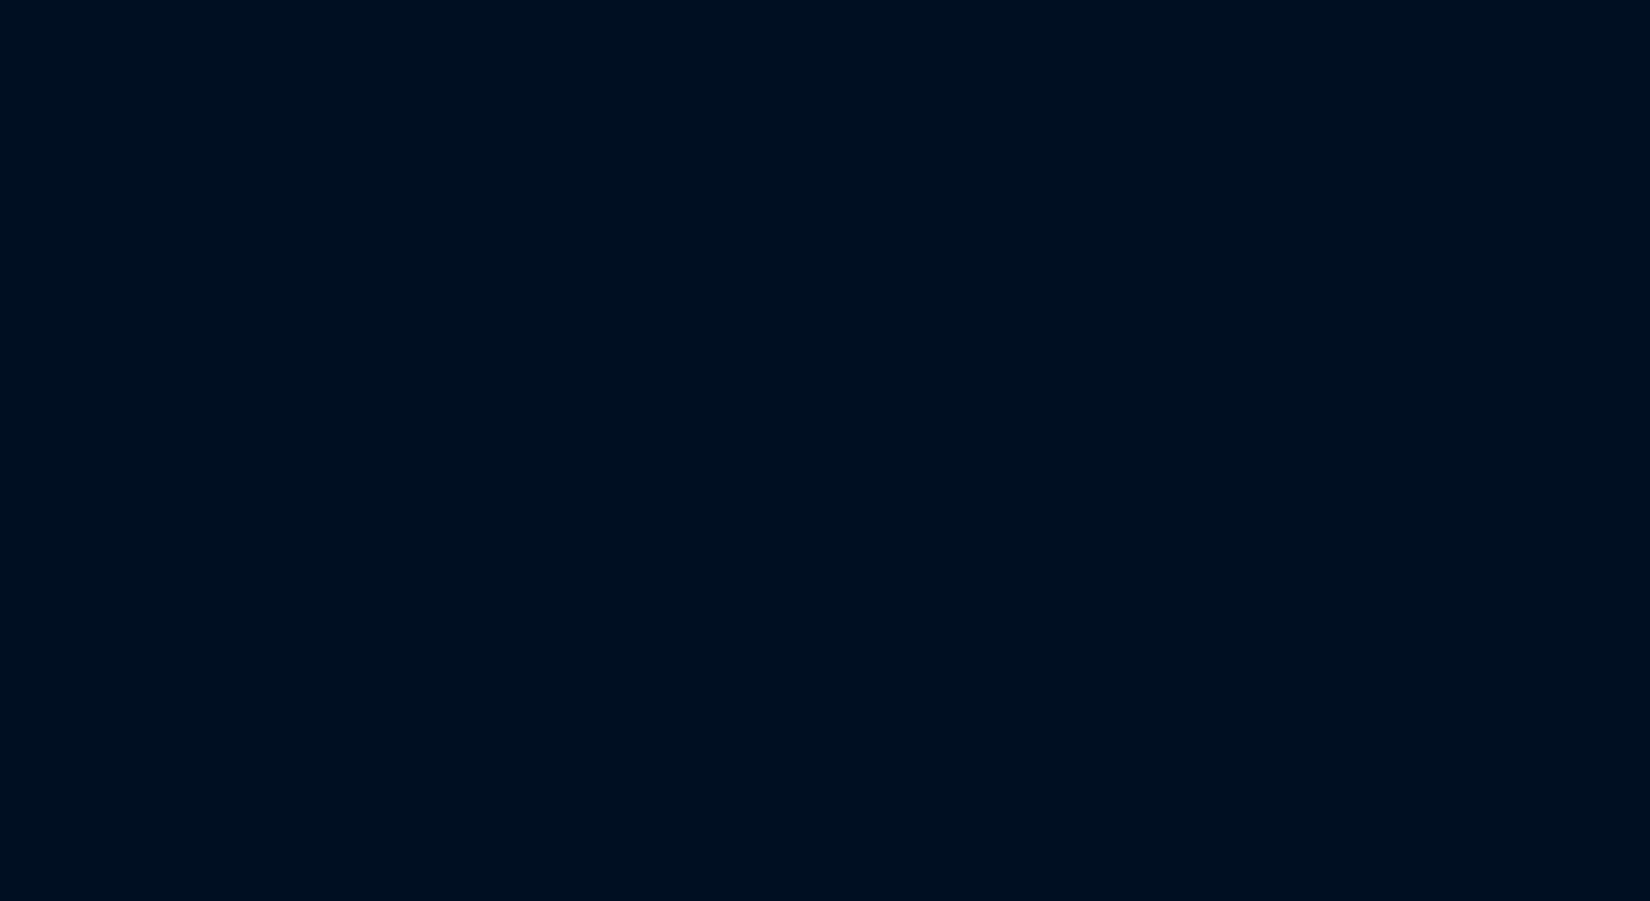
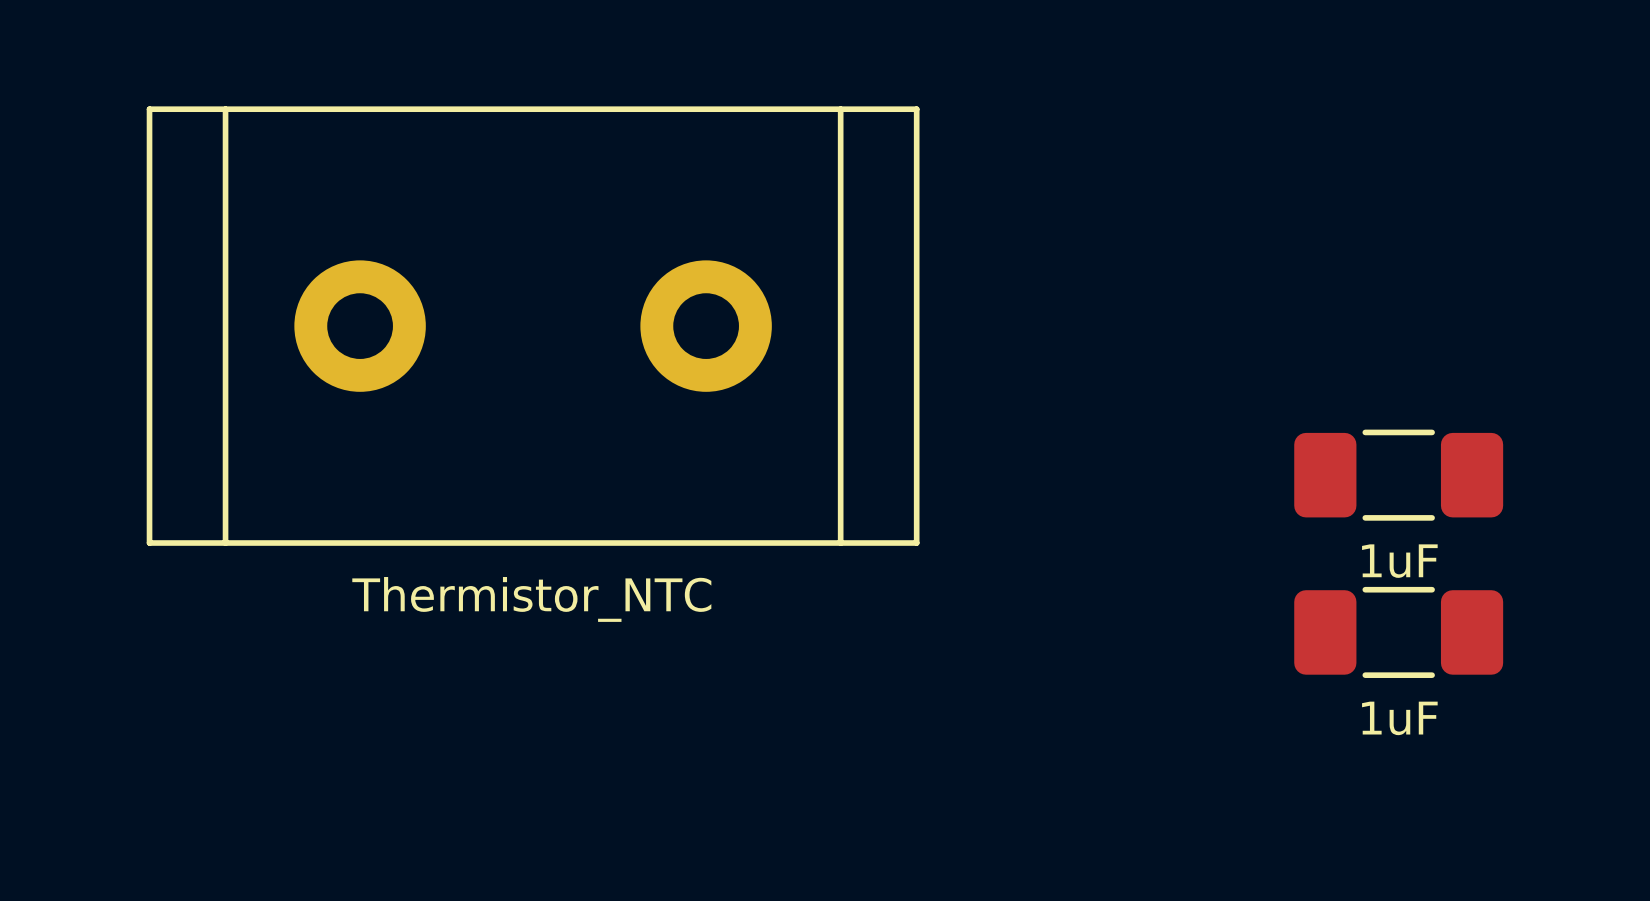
part: none -> Thermistor_NTC (533, 326)
part: none -> 1uF (1398, 475)
part: none -> 1uF (1398, 632)

